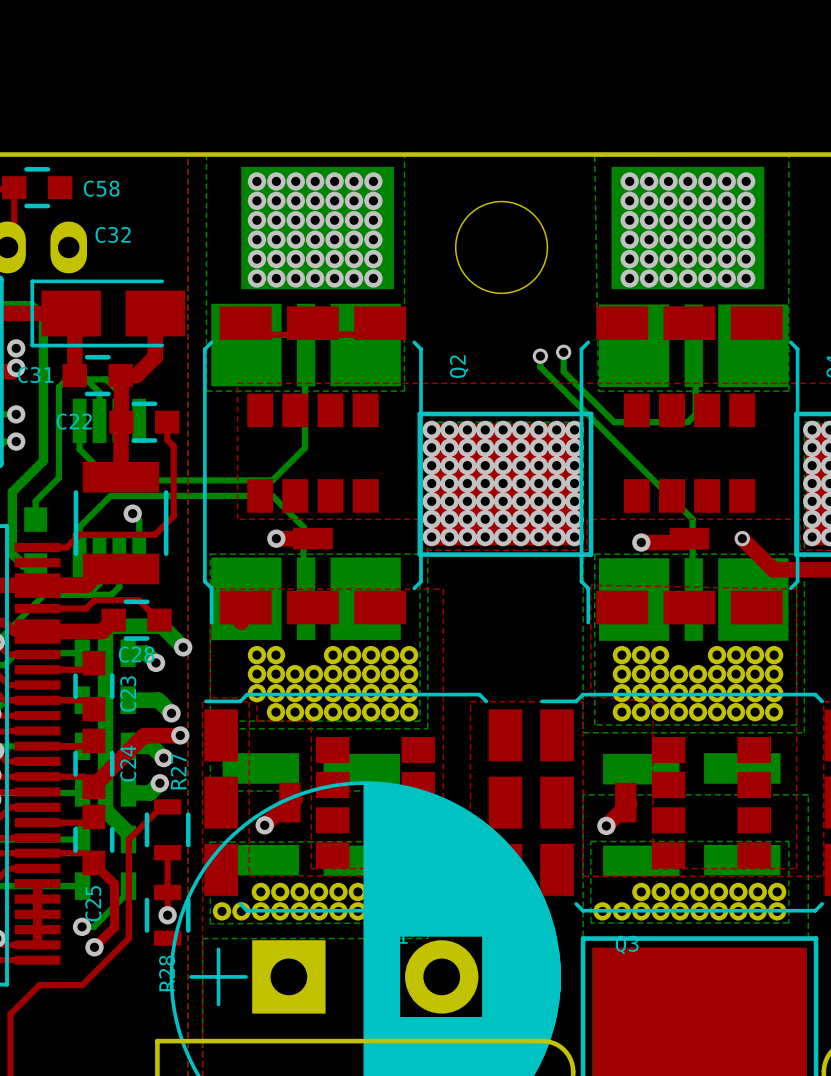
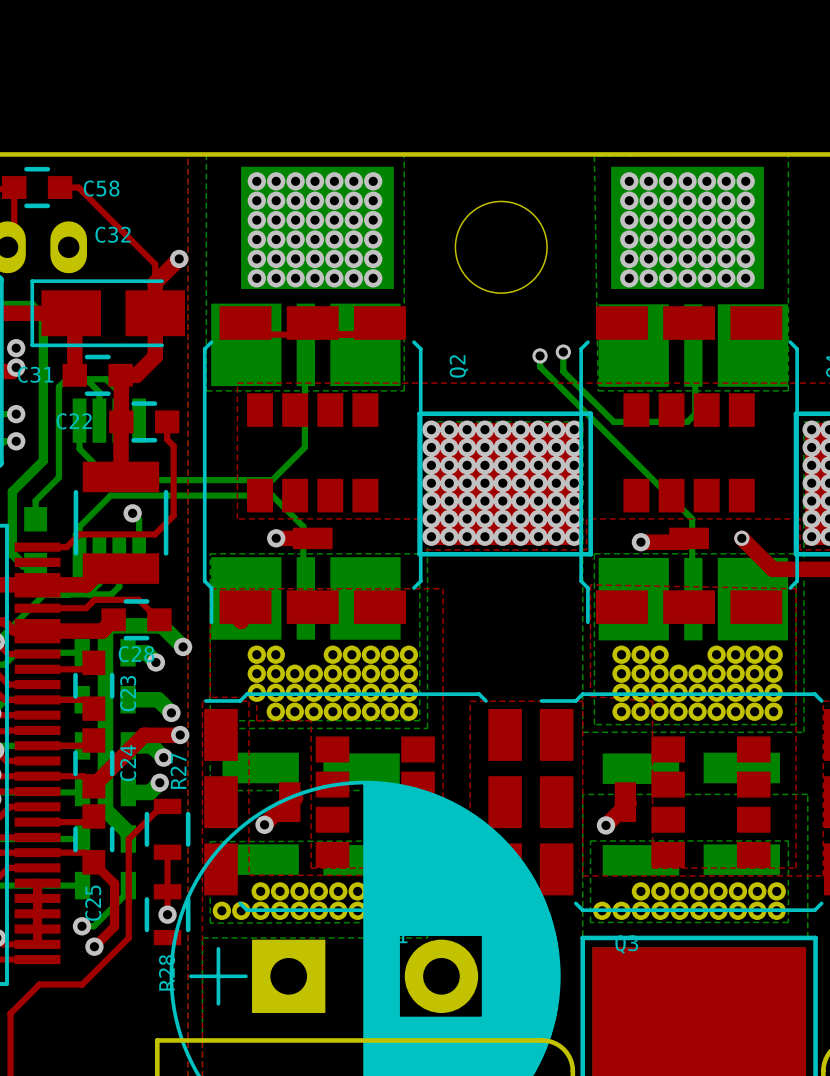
top track: none -> (60, 187) (78, 187) (155, 264) (155, 313) (155, 282) (179, 258)
via: none -> (179, 258)

